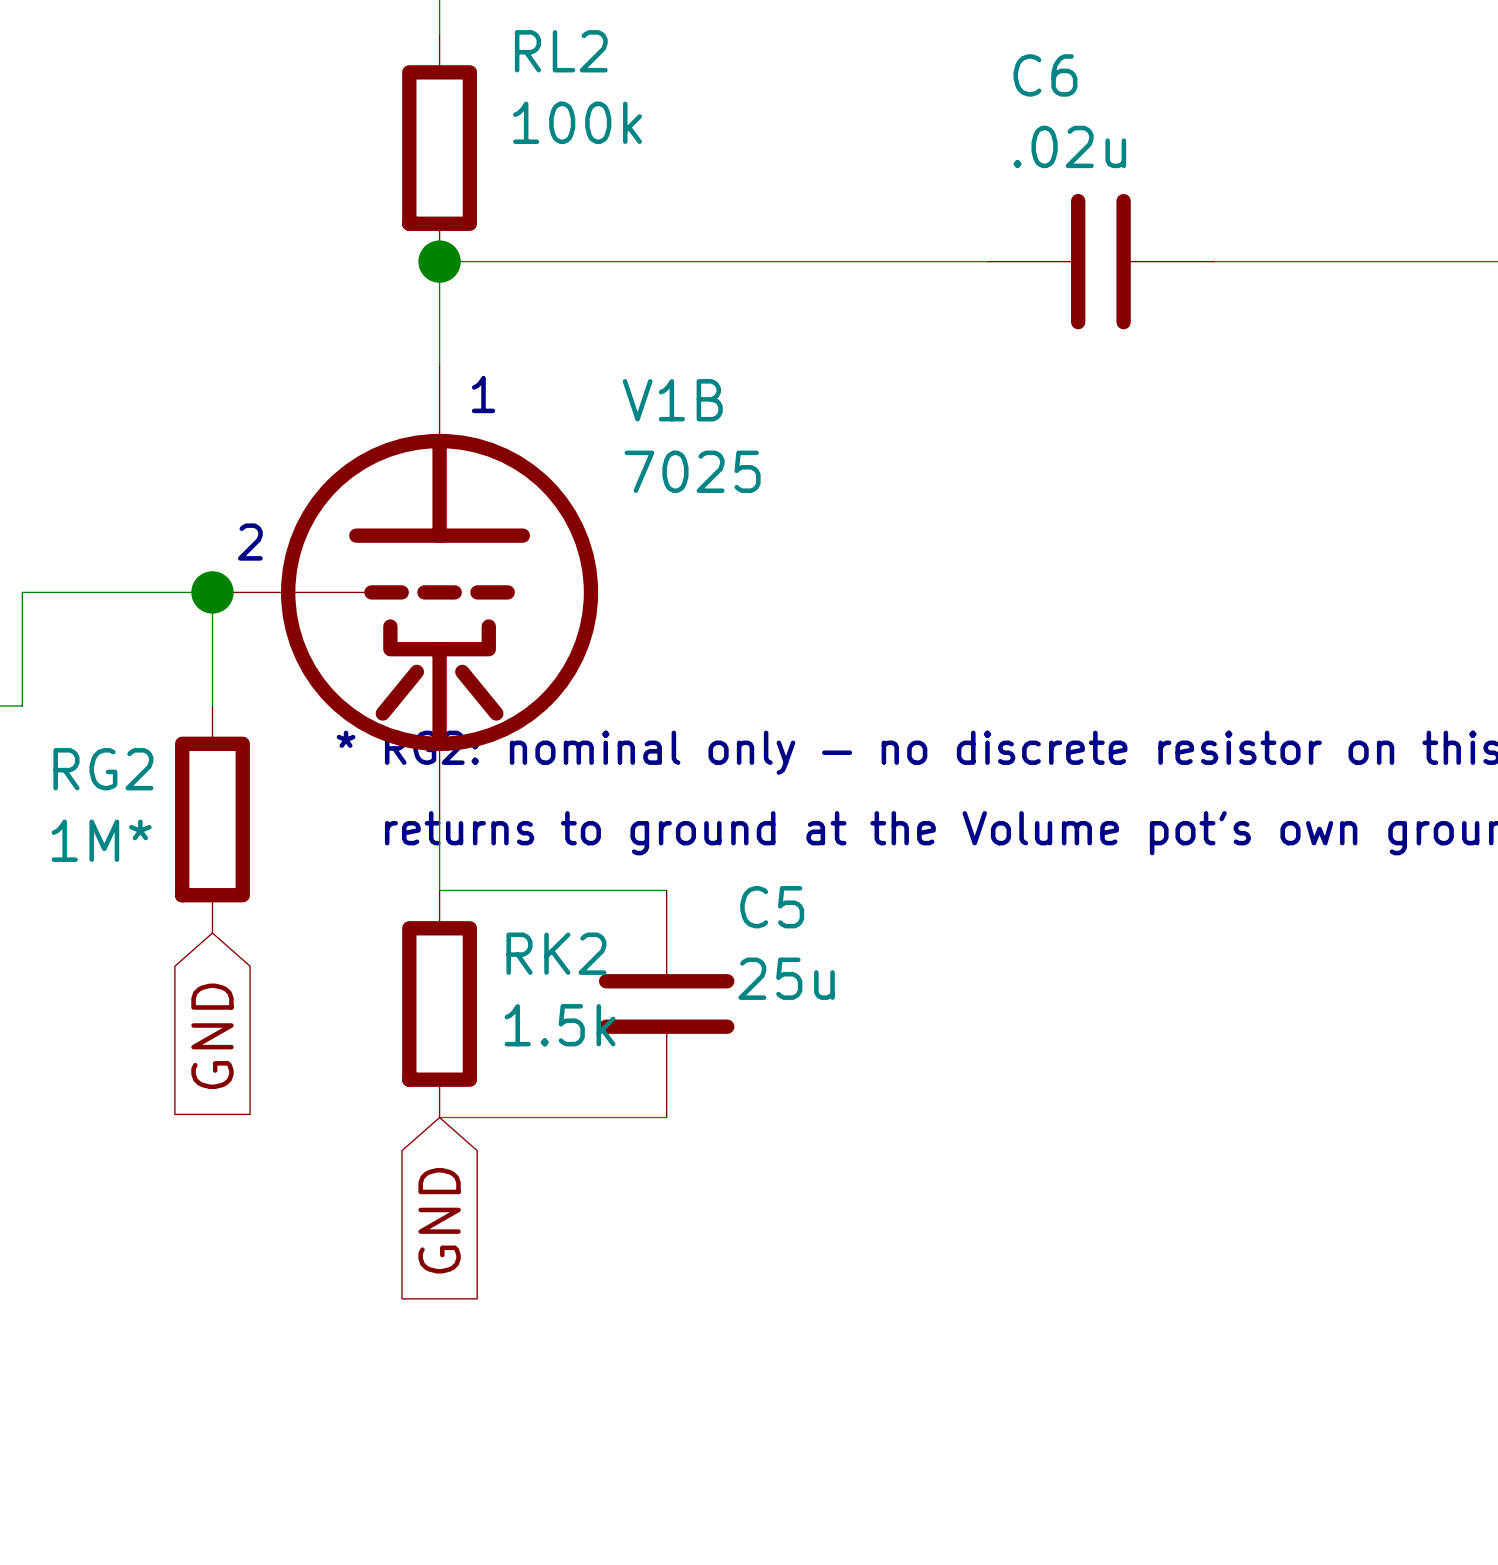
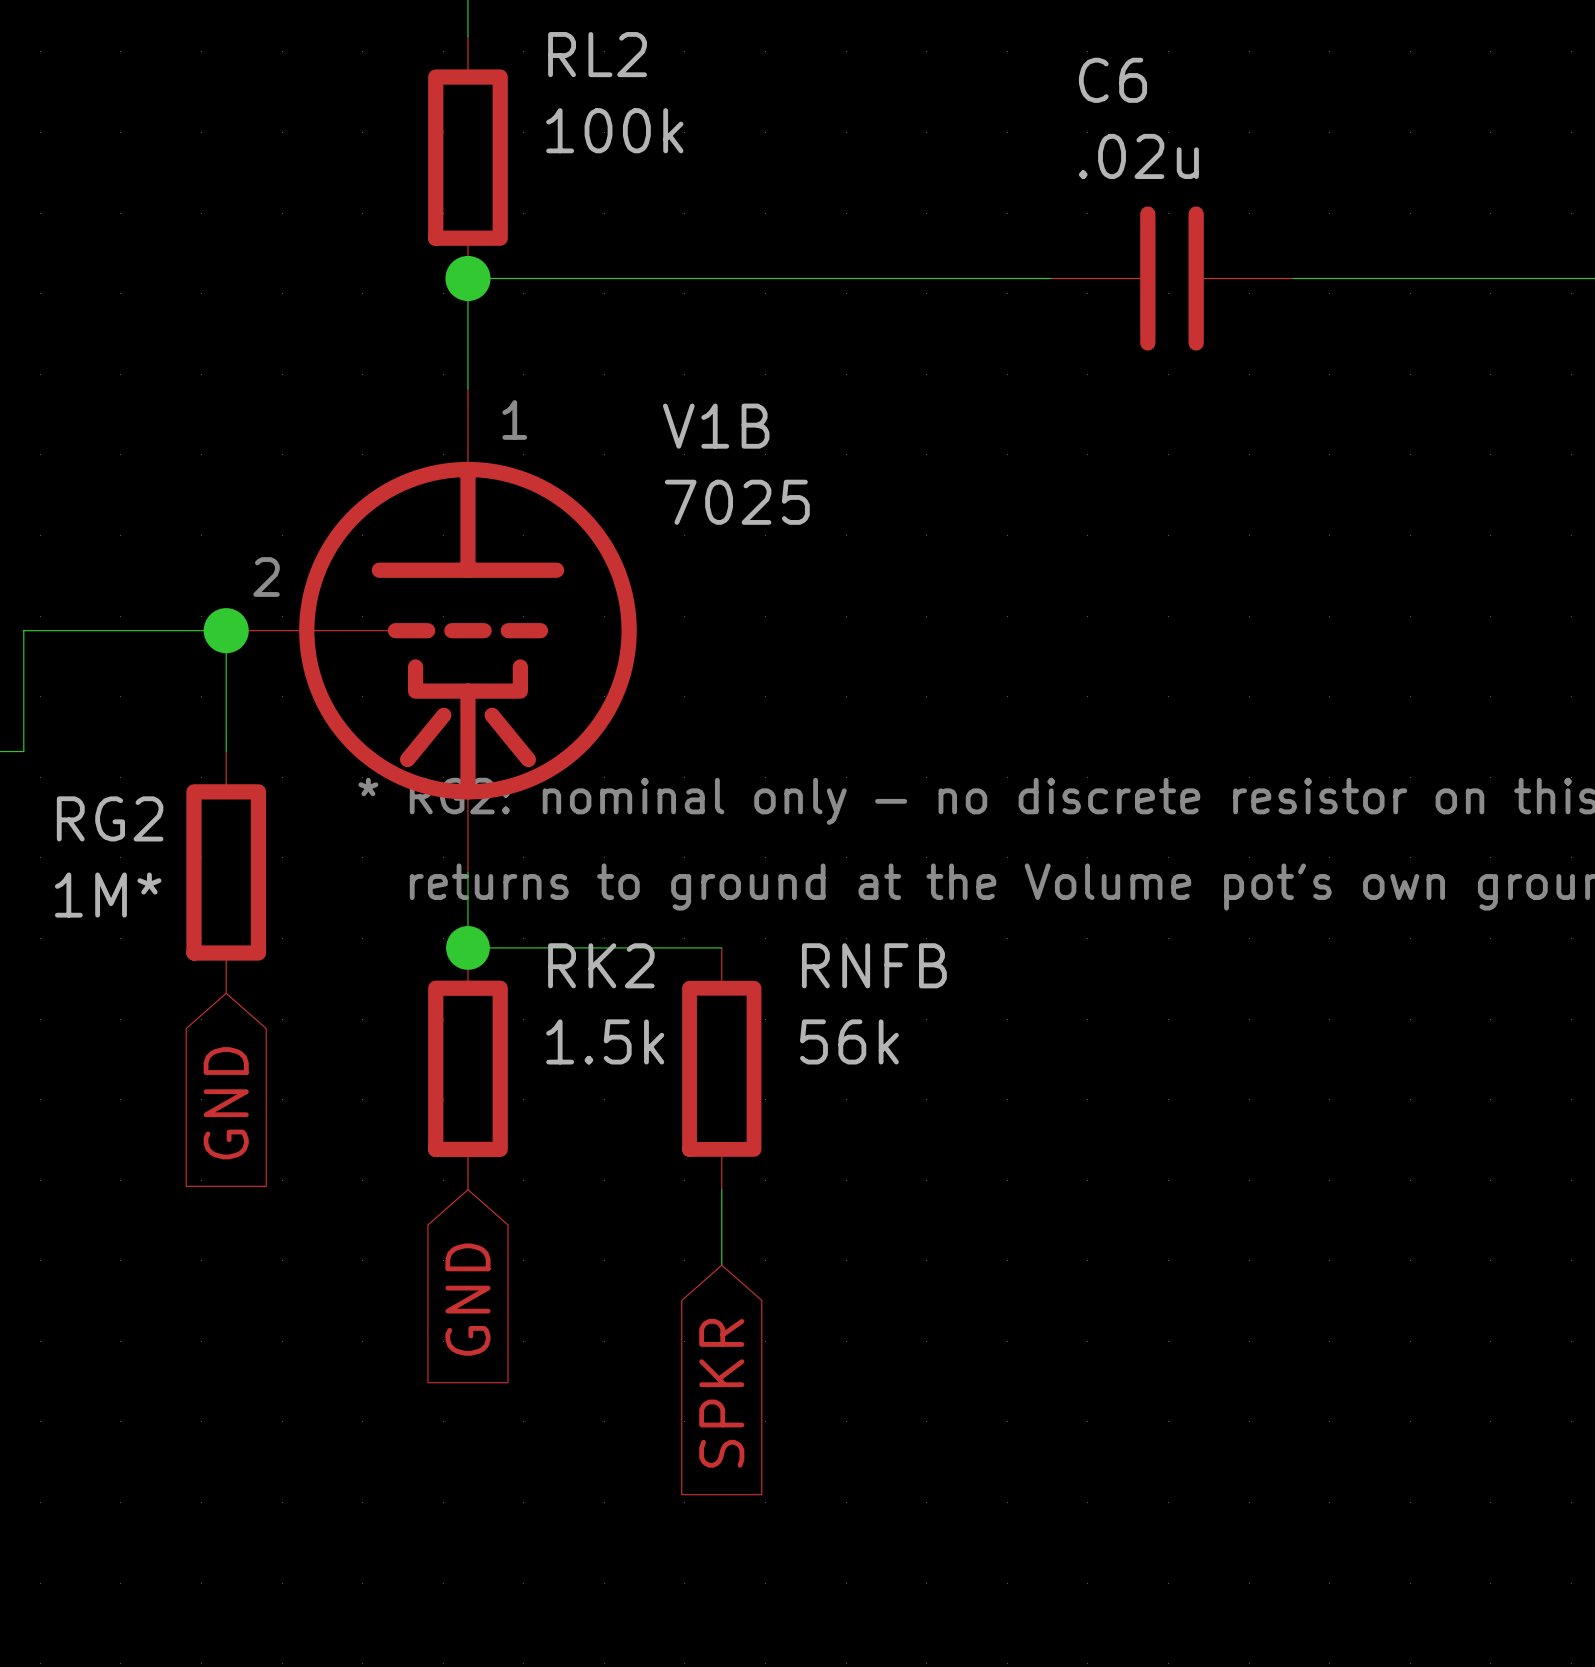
junction: none -> (467, 947)
wire: none -> (709, 947) (721, 947)
RK2 name position: RK2 (556, 953) -> RK2 (601, 965)
C5: 25u (666, 1003) -> none
RNFB: none -> 56k (721, 1068)
RK2 value position: 1.5k (560, 1025) -> 1.5k (605, 1041)
wire: (439, 1117) (666, 1117) -> none
wire: none -> (721, 1189) (721, 1265)
global label: none -> SPKR (721, 1393)

